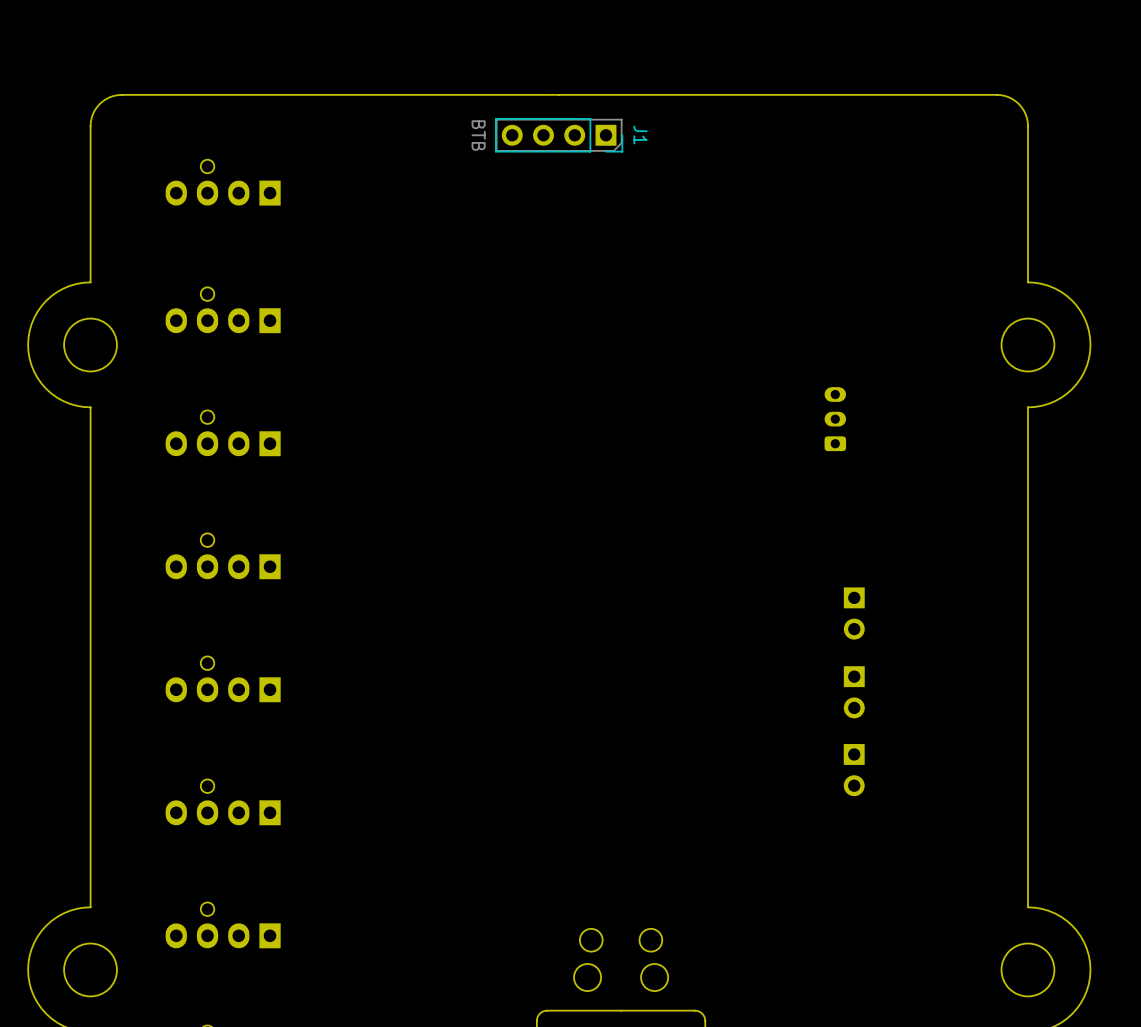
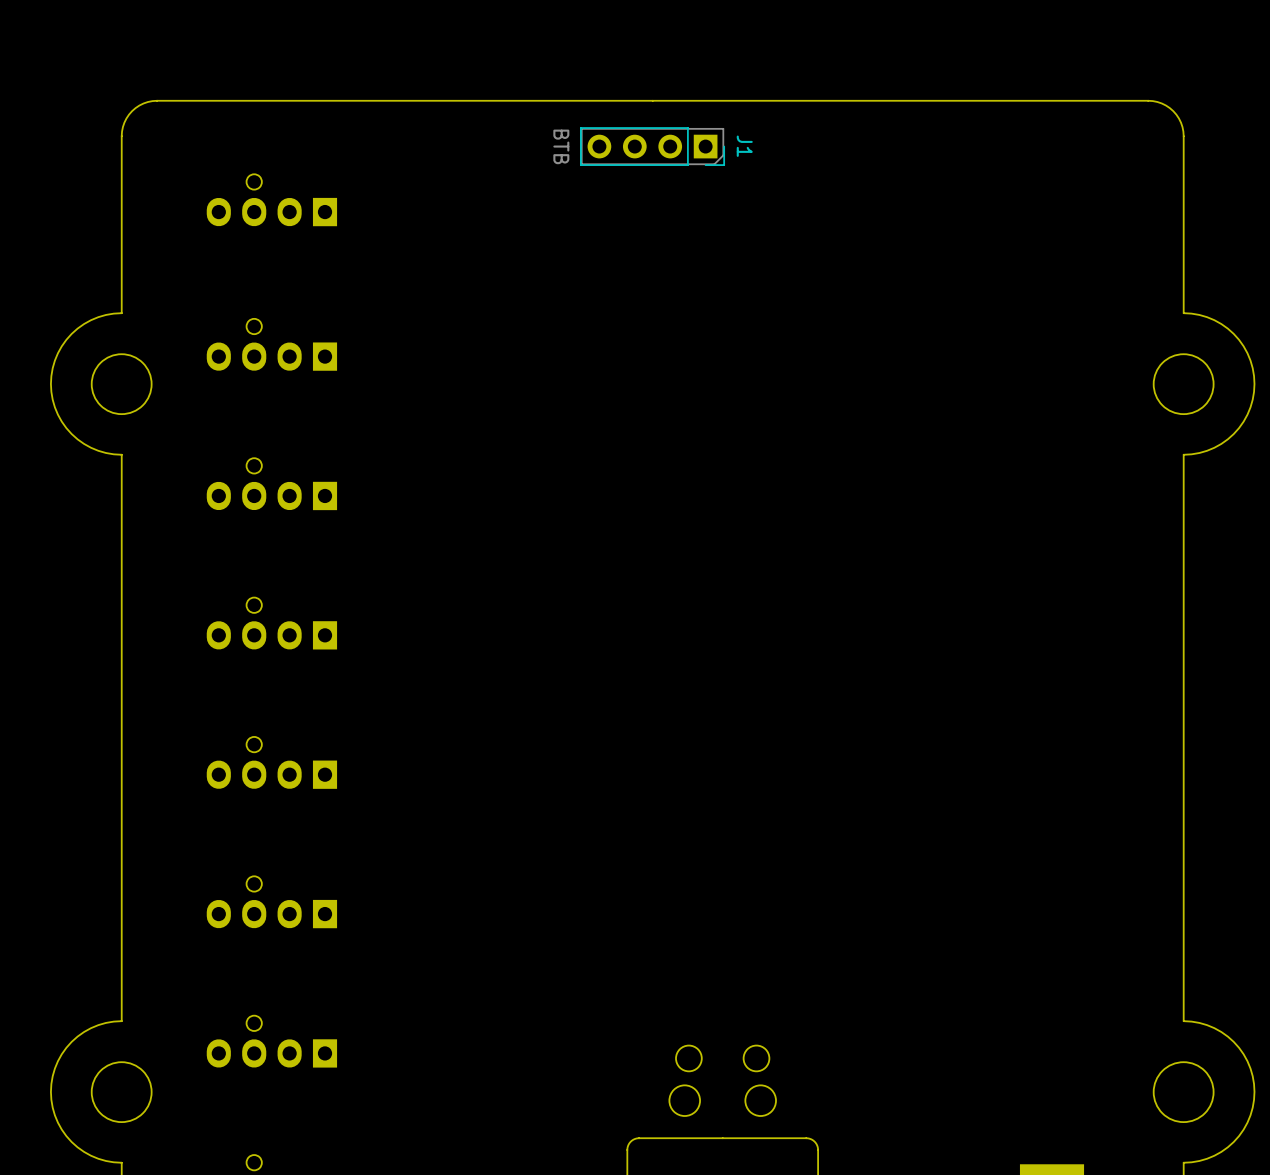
part: (835, 419) -> none
part: (854, 613) -> none
part: (854, 692) -> none
part: (854, 770) -> none

